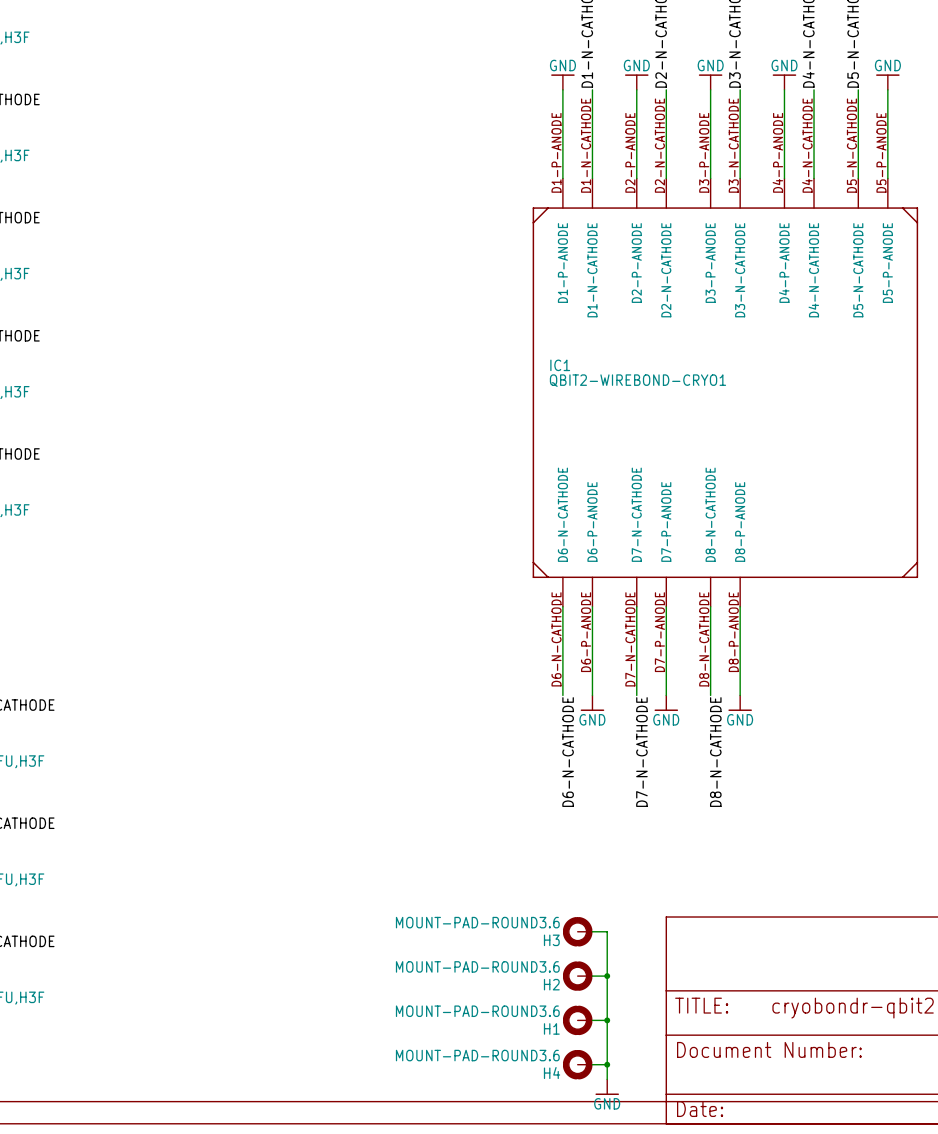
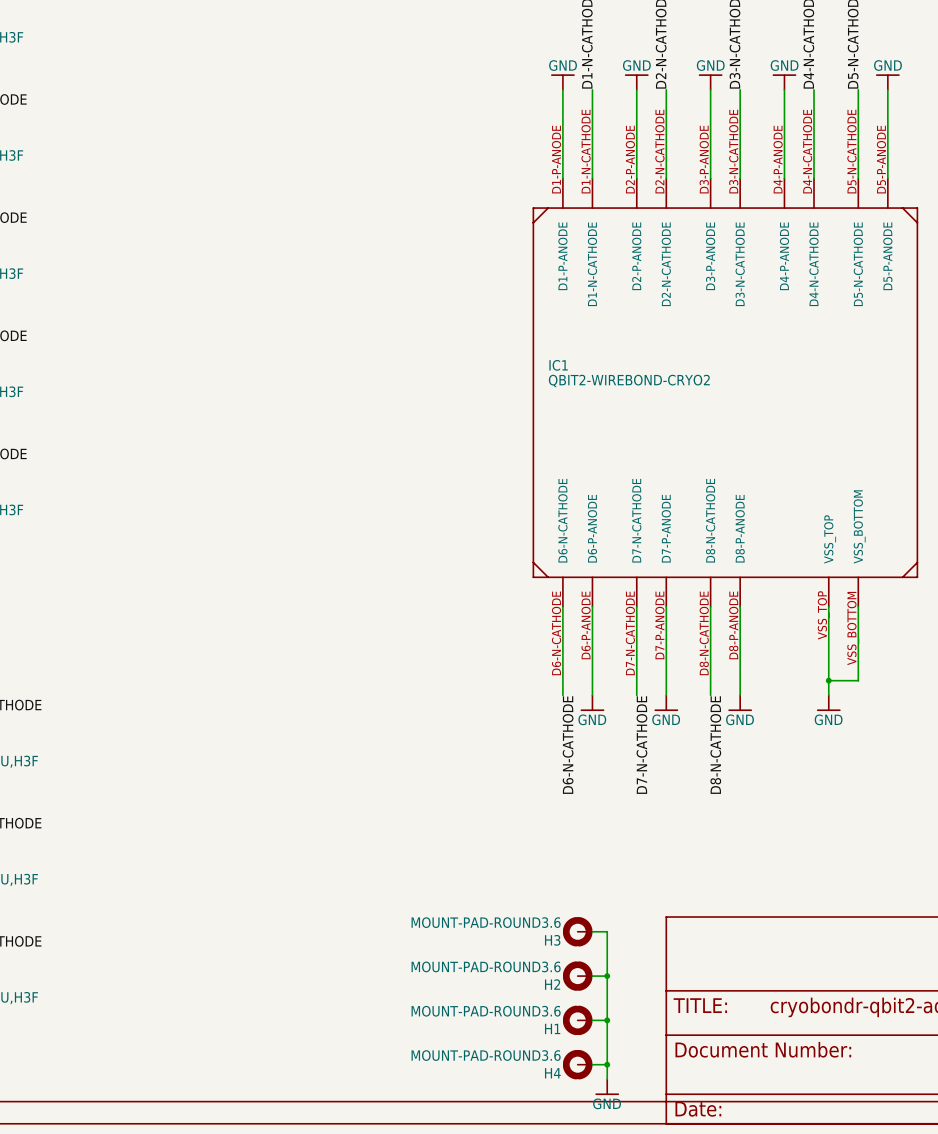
IC1 symbol: [532, 178, 919, 607] -> [532, 178, 919, 607]
IC1 value: QBIT2-WIREBOND-CRYO1 (637, 380) -> QBIT2-WIREBOND-CRYO2 (629, 380)
wire: none -> (828, 606) (828, 695)
wire: none -> (858, 606) (858, 680) (828, 680)
junction: none -> (828, 680)
power symbol: none -> GND (828, 703)

